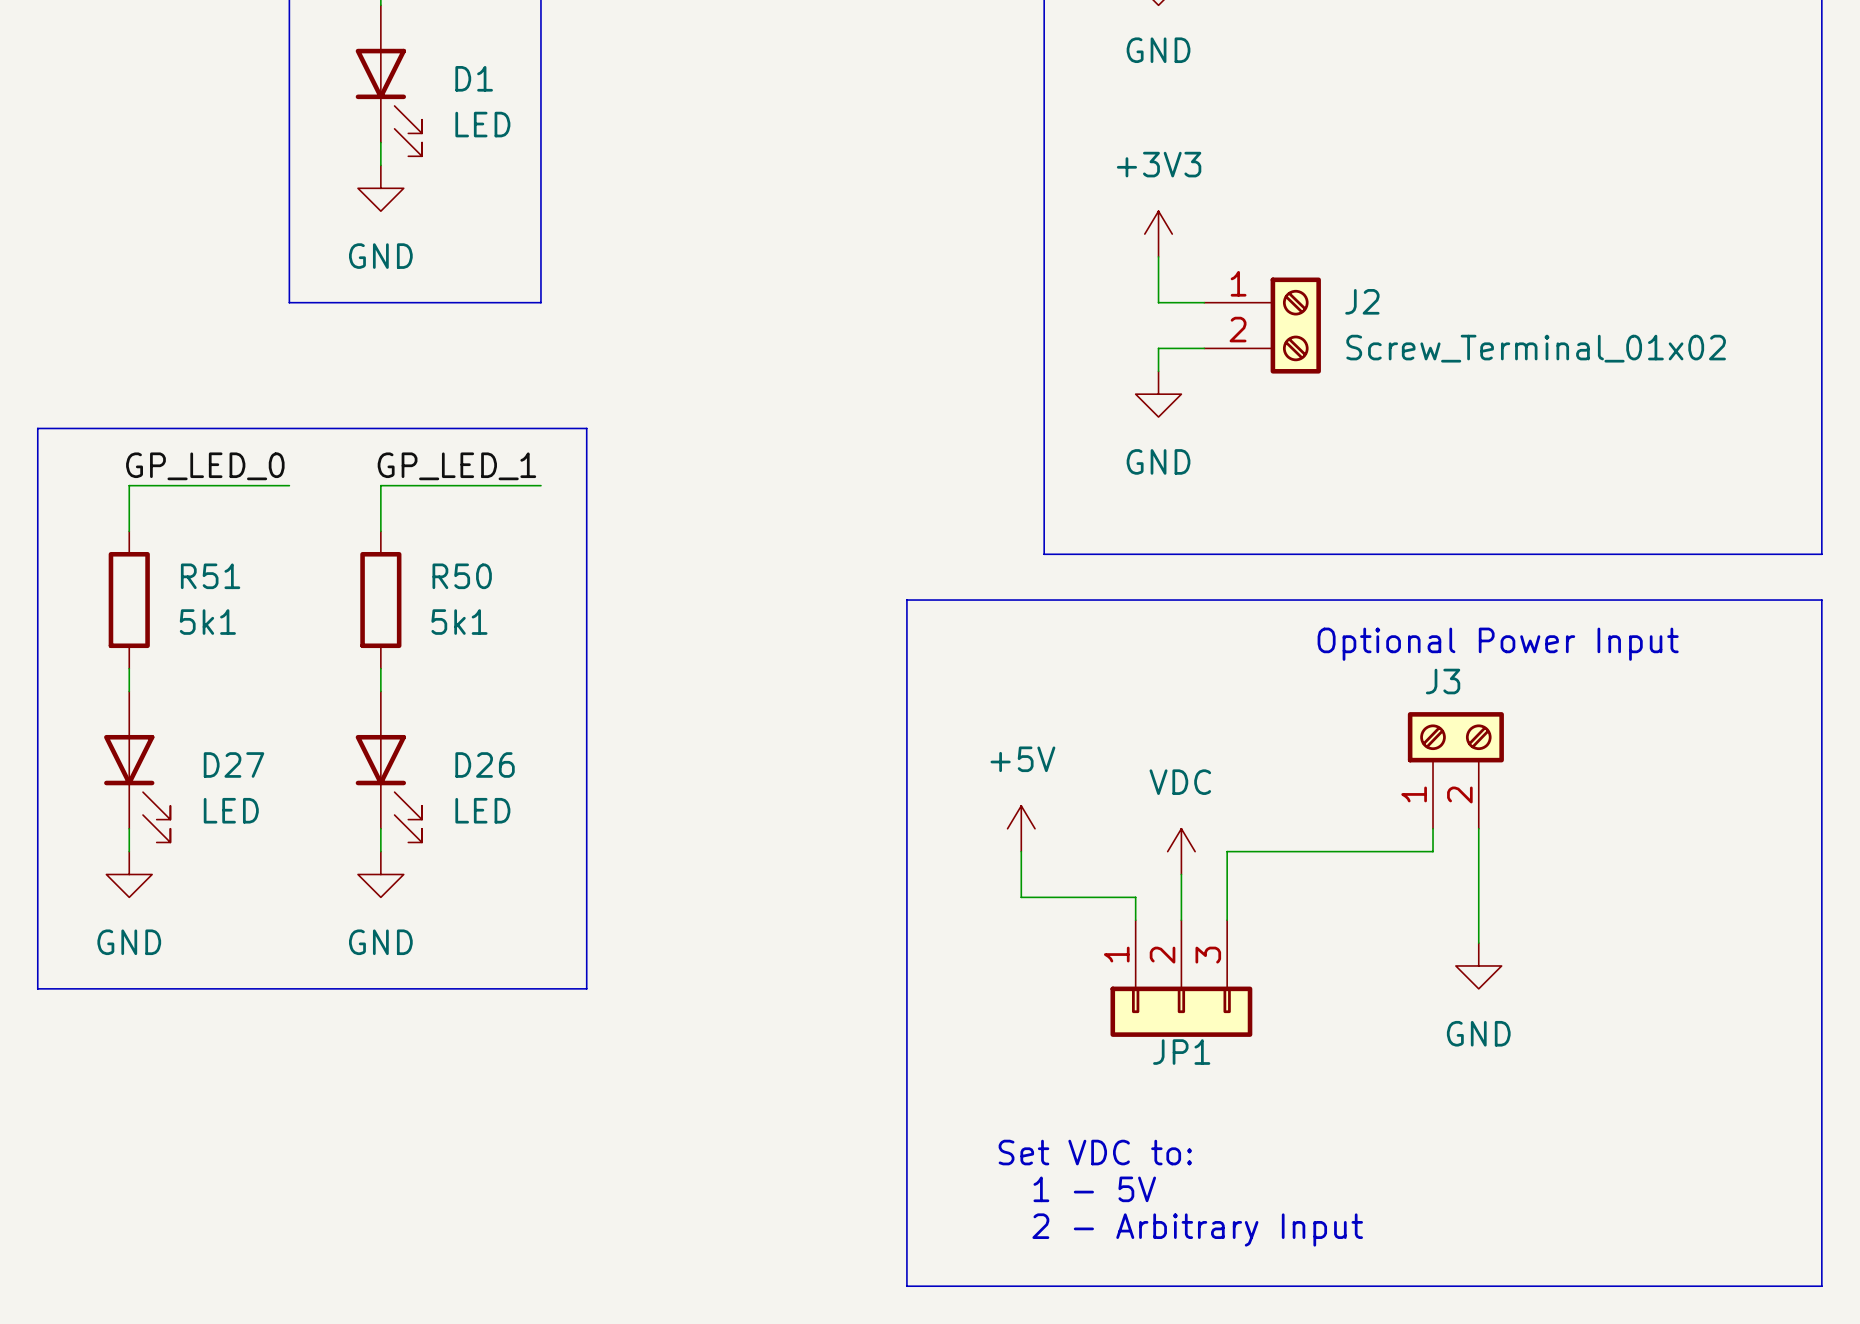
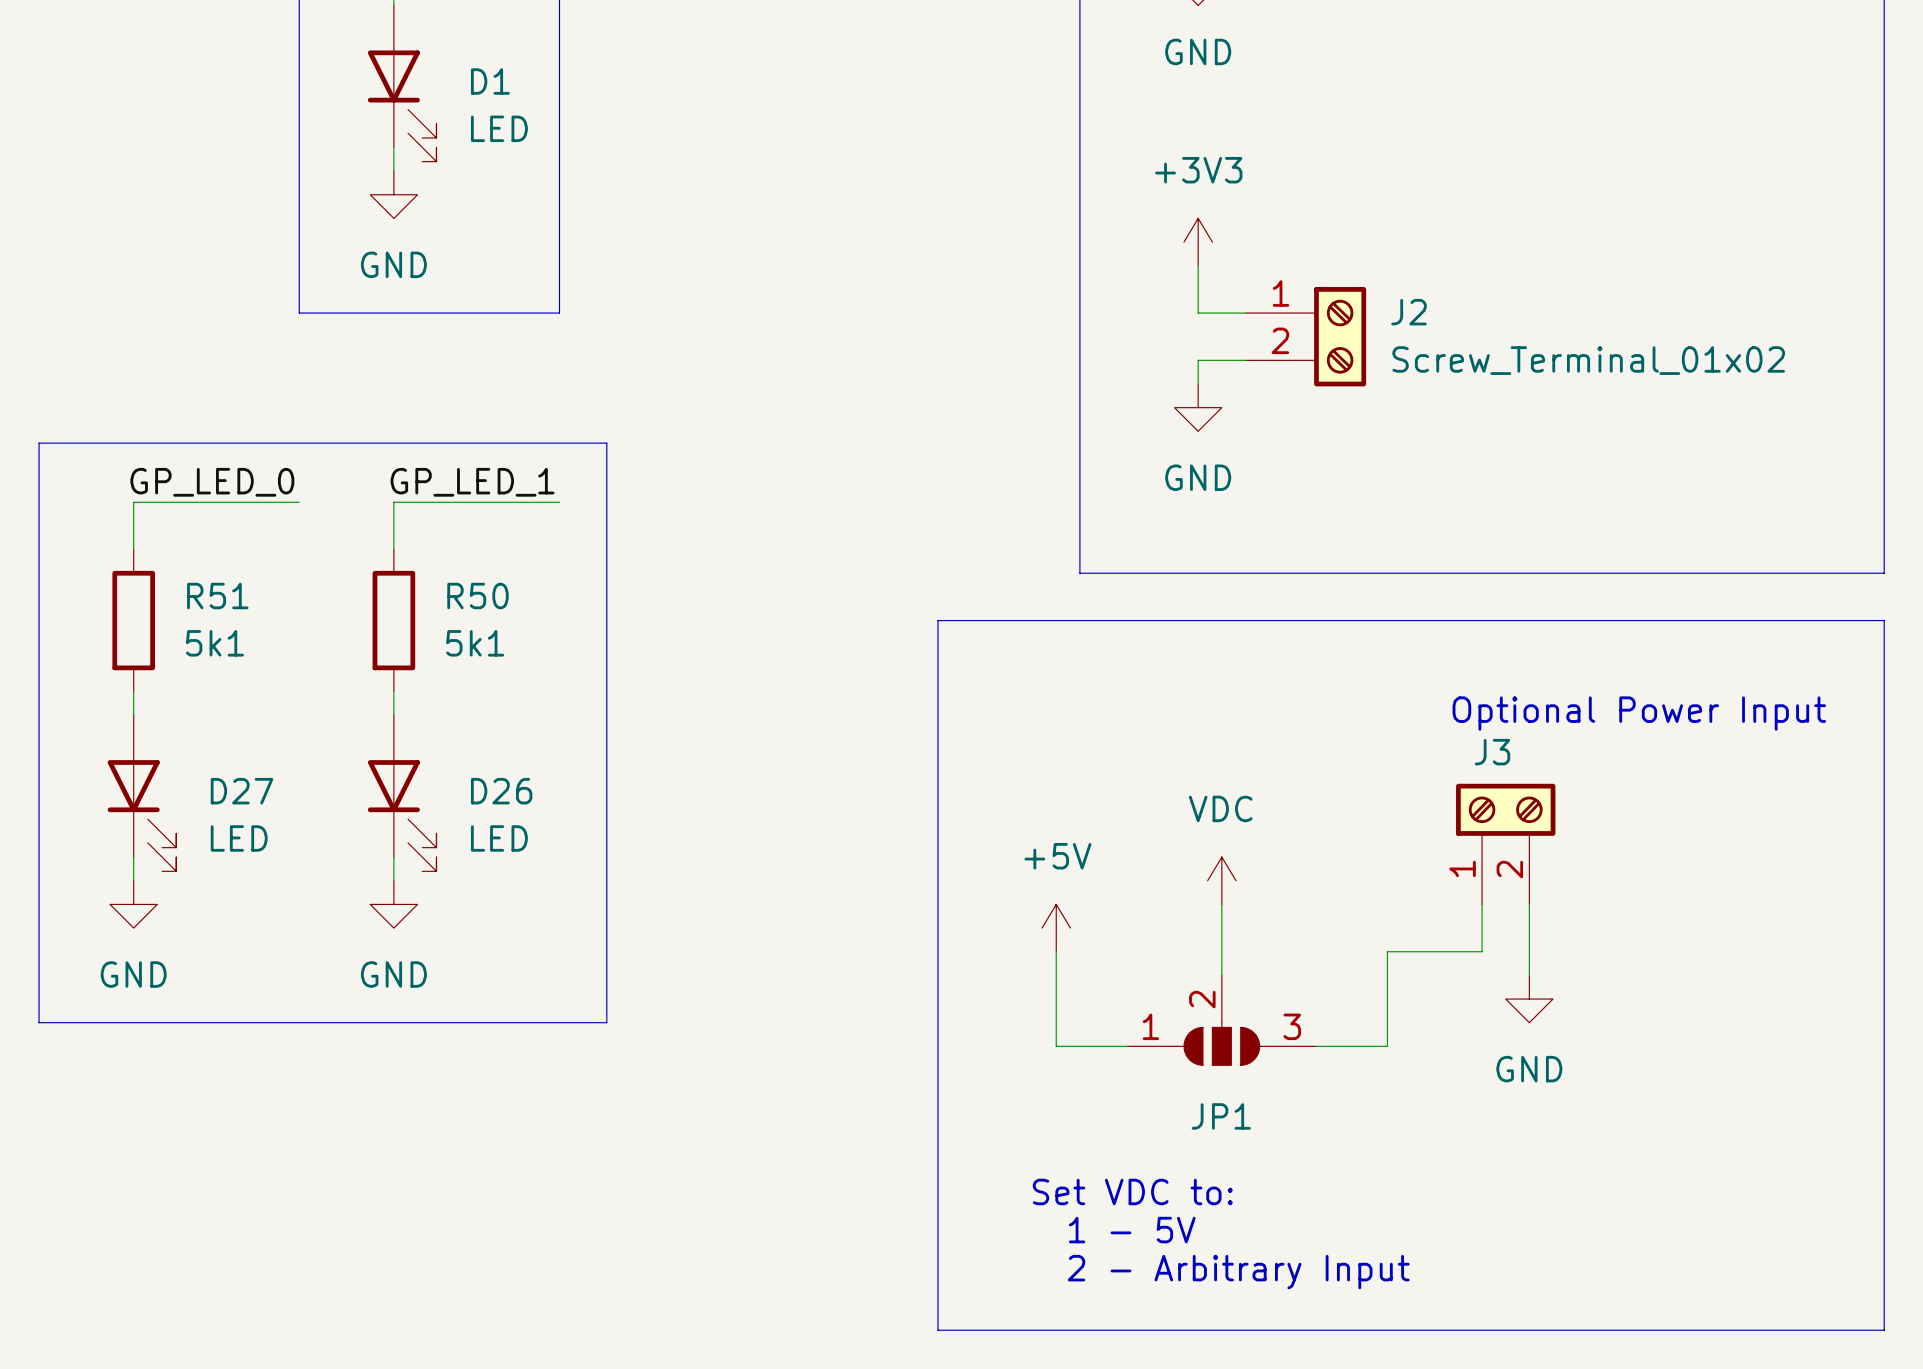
text position: Optional Power Input (1498, 644) -> Optional Power Input (1639, 713)
J3 position: (1455, 770) -> (1505, 844)
power symbol position: +5V (1021, 828) -> +5V (1056, 928)
wire: (1433, 828) (1433, 851) (1227, 851) (1227, 920) -> none
wire: (1021, 851) (1021, 897) (1135, 897) (1135, 920) -> none
wire: none -> (1482, 904) (1482, 951) (1387, 951) (1387, 1046) (1316, 1046)
wire: none -> (1056, 951) (1056, 1046) (1127, 1046)
JP1 symbol: [1110, 920, 1253, 1037] -> [1127, 975, 1317, 1066]

